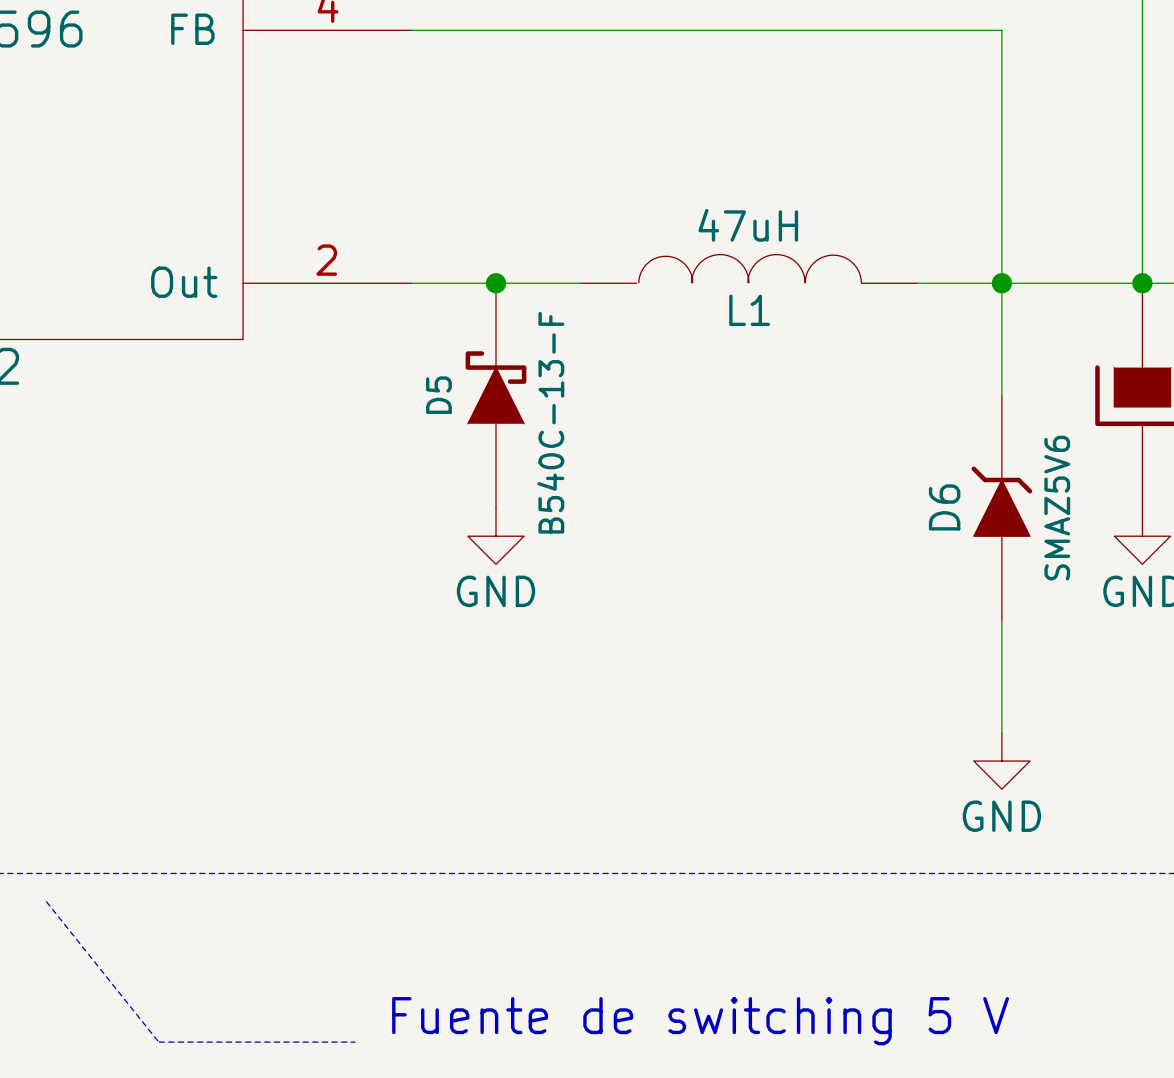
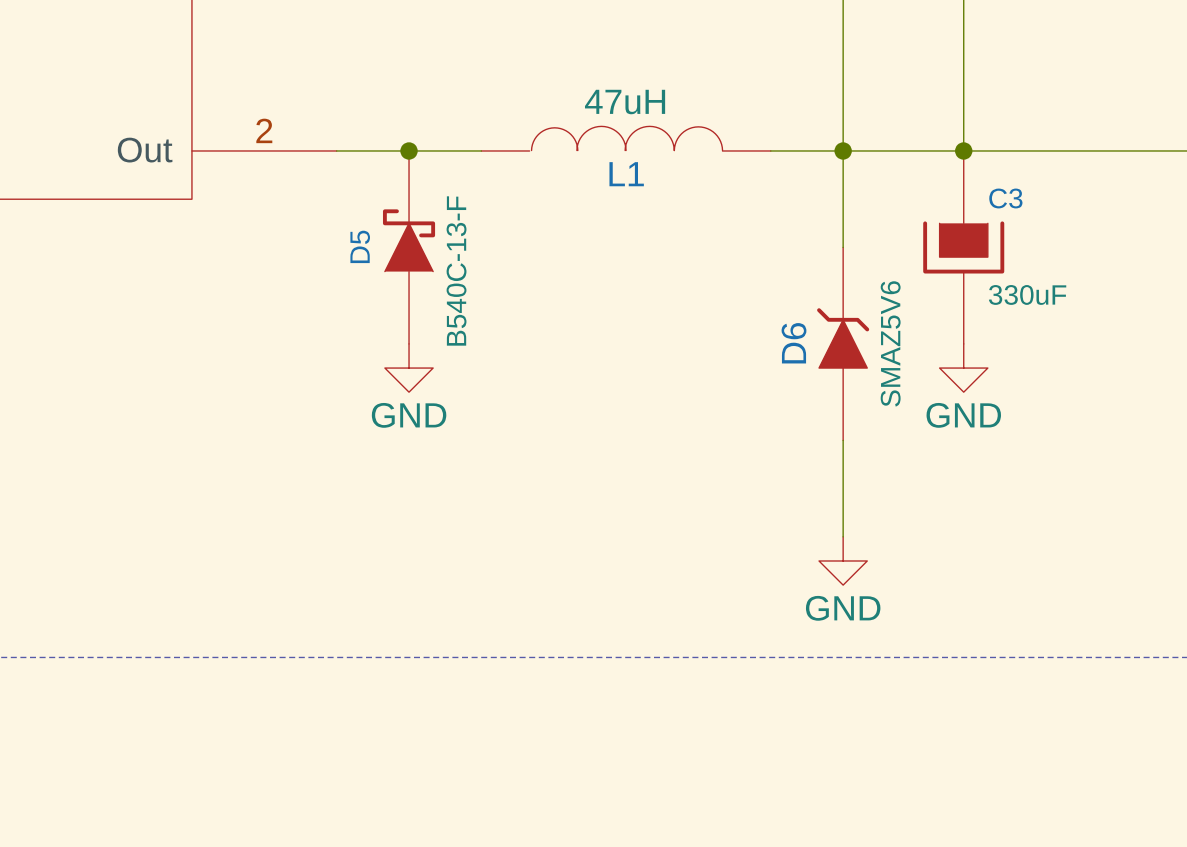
line: (46, 901) (158, 1042) (355, 1042) -> none
text: Fuente de switching 5 V (700, 1021) -> none

